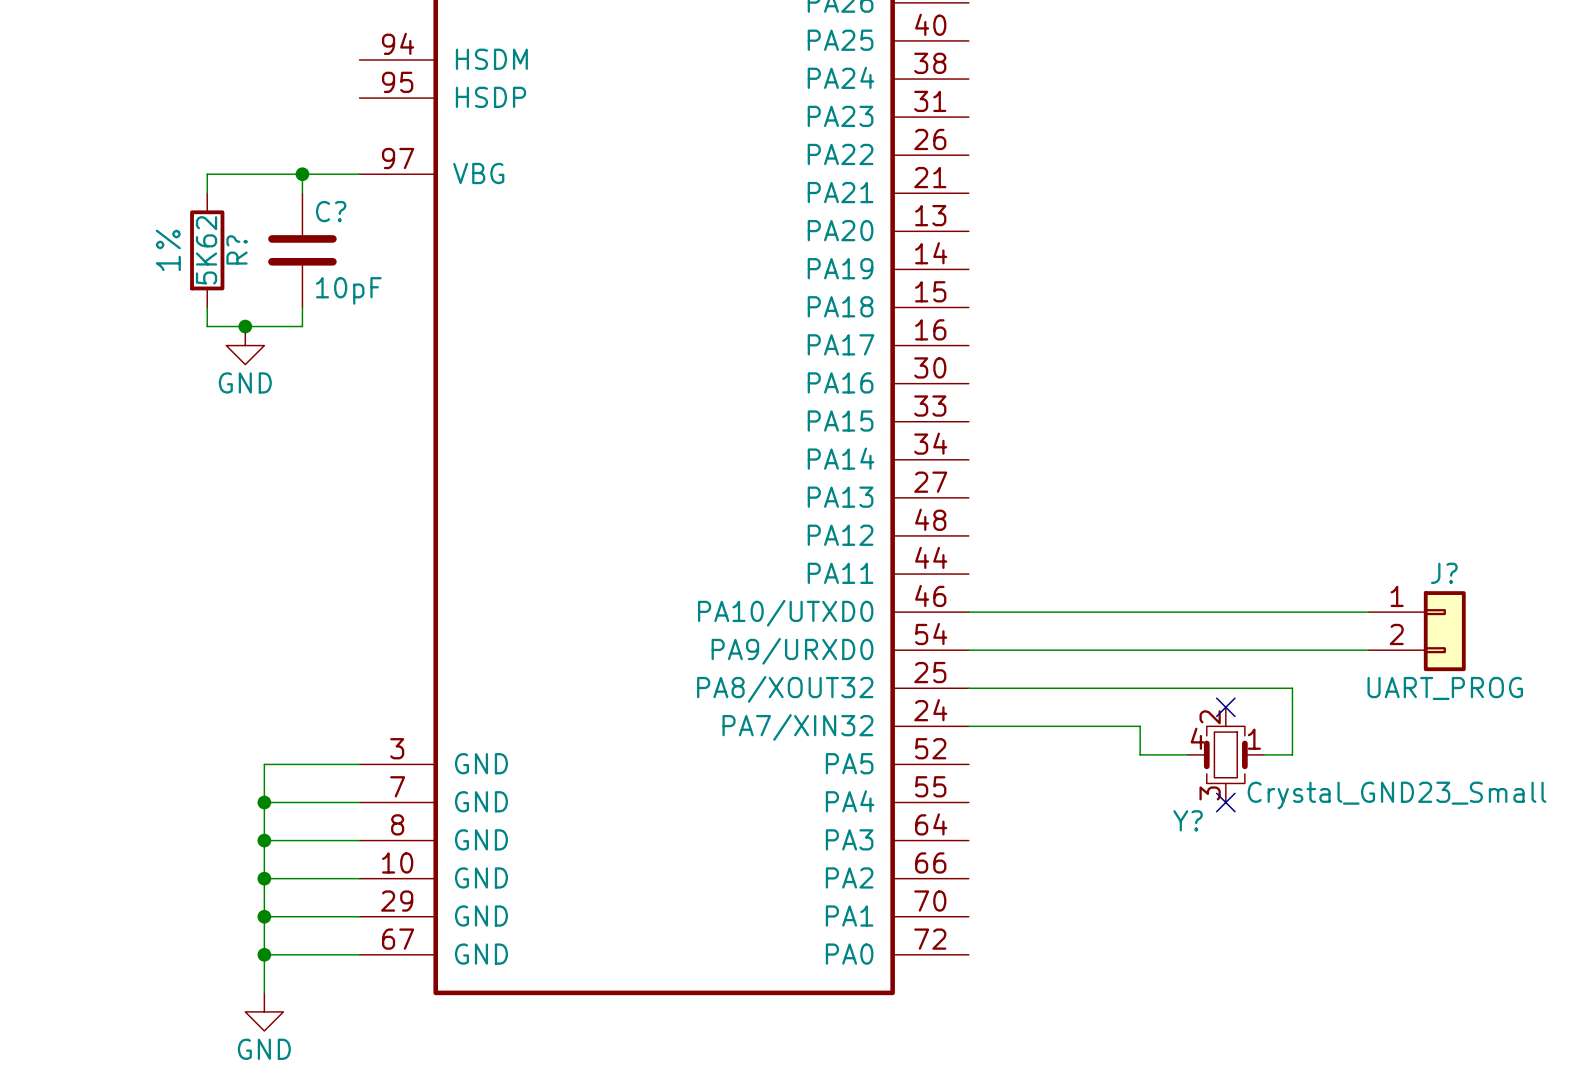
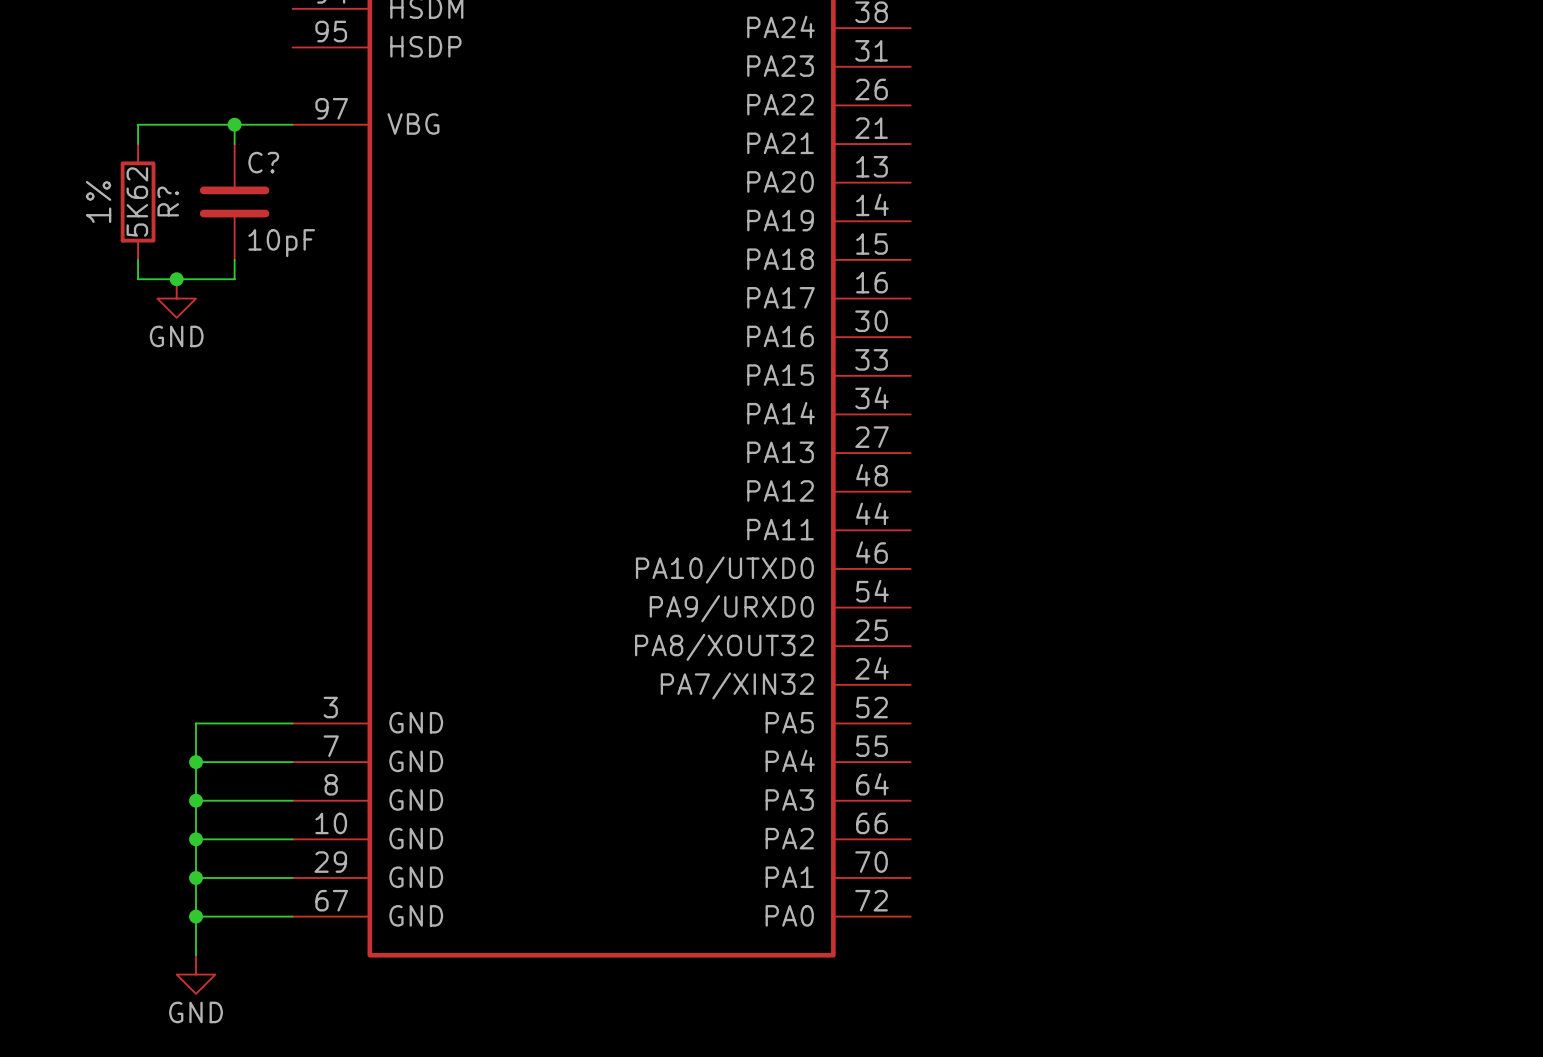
wire: (968, 612) (1368, 612) -> none
J?: UART_PROG (1417, 631) -> none
wire: (968, 650) (1368, 650) -> none
wire: (968, 688) (1292, 688) (1292, 754) (1263, 754) -> none
no-connect mark: (1225, 707) -> none
wire: (968, 726) (1140, 726) (1140, 754) (1187, 754) -> none
Y?: Crystal_GND23_Small (1225, 754) -> none
no-connect mark: (1225, 802) -> none

